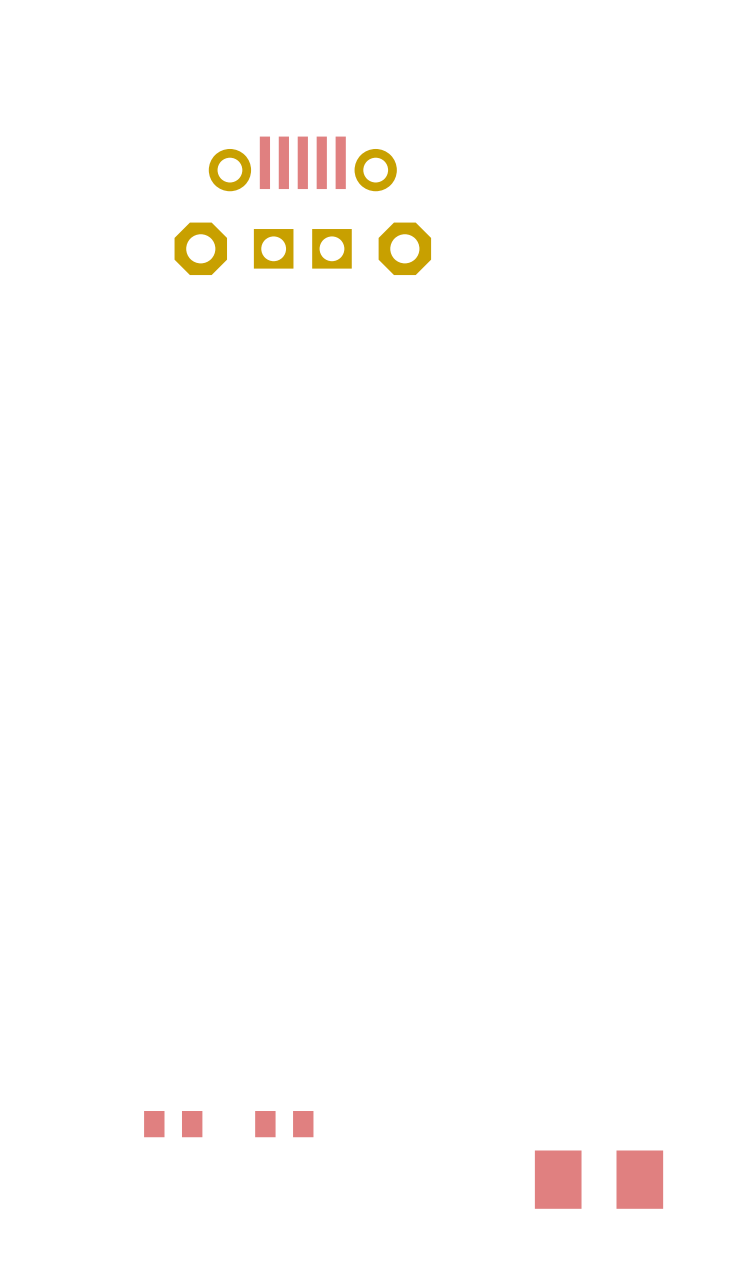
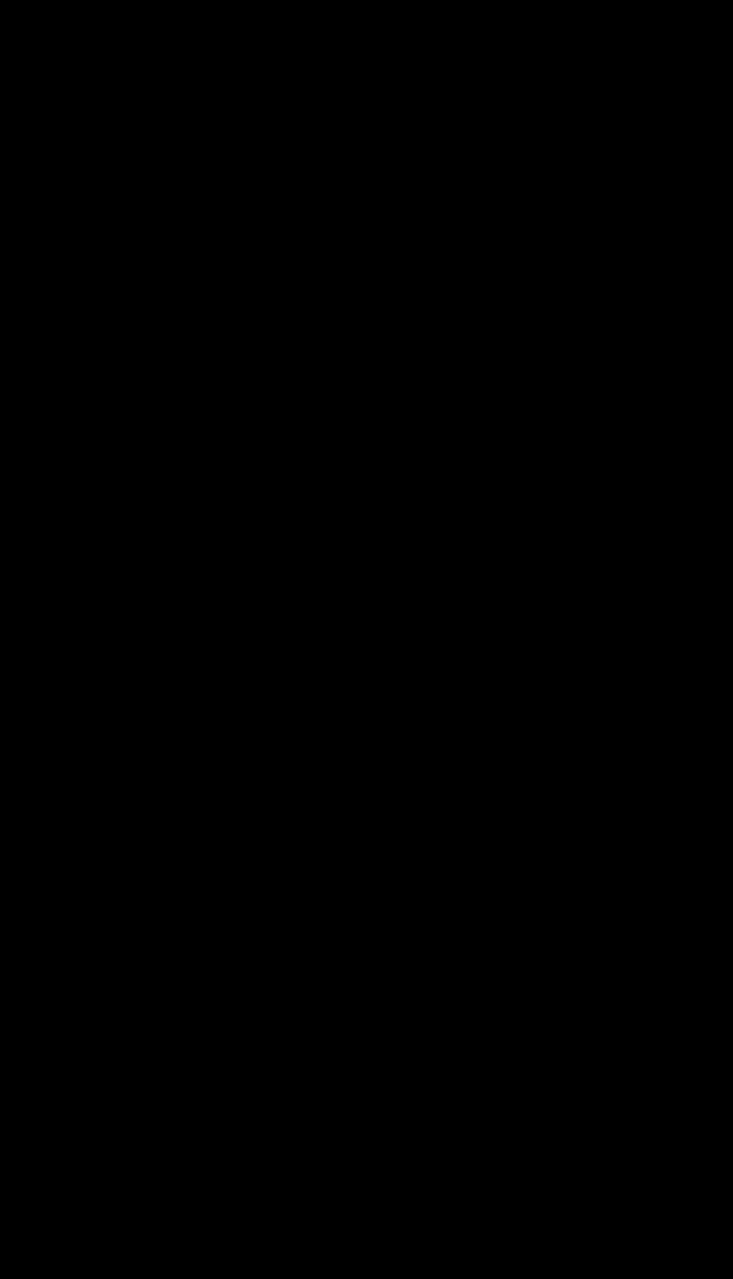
part: (302, 205) -> none
part: (173, 1124) -> none
part: (284, 1124) -> none
part: (599, 1179) -> none

